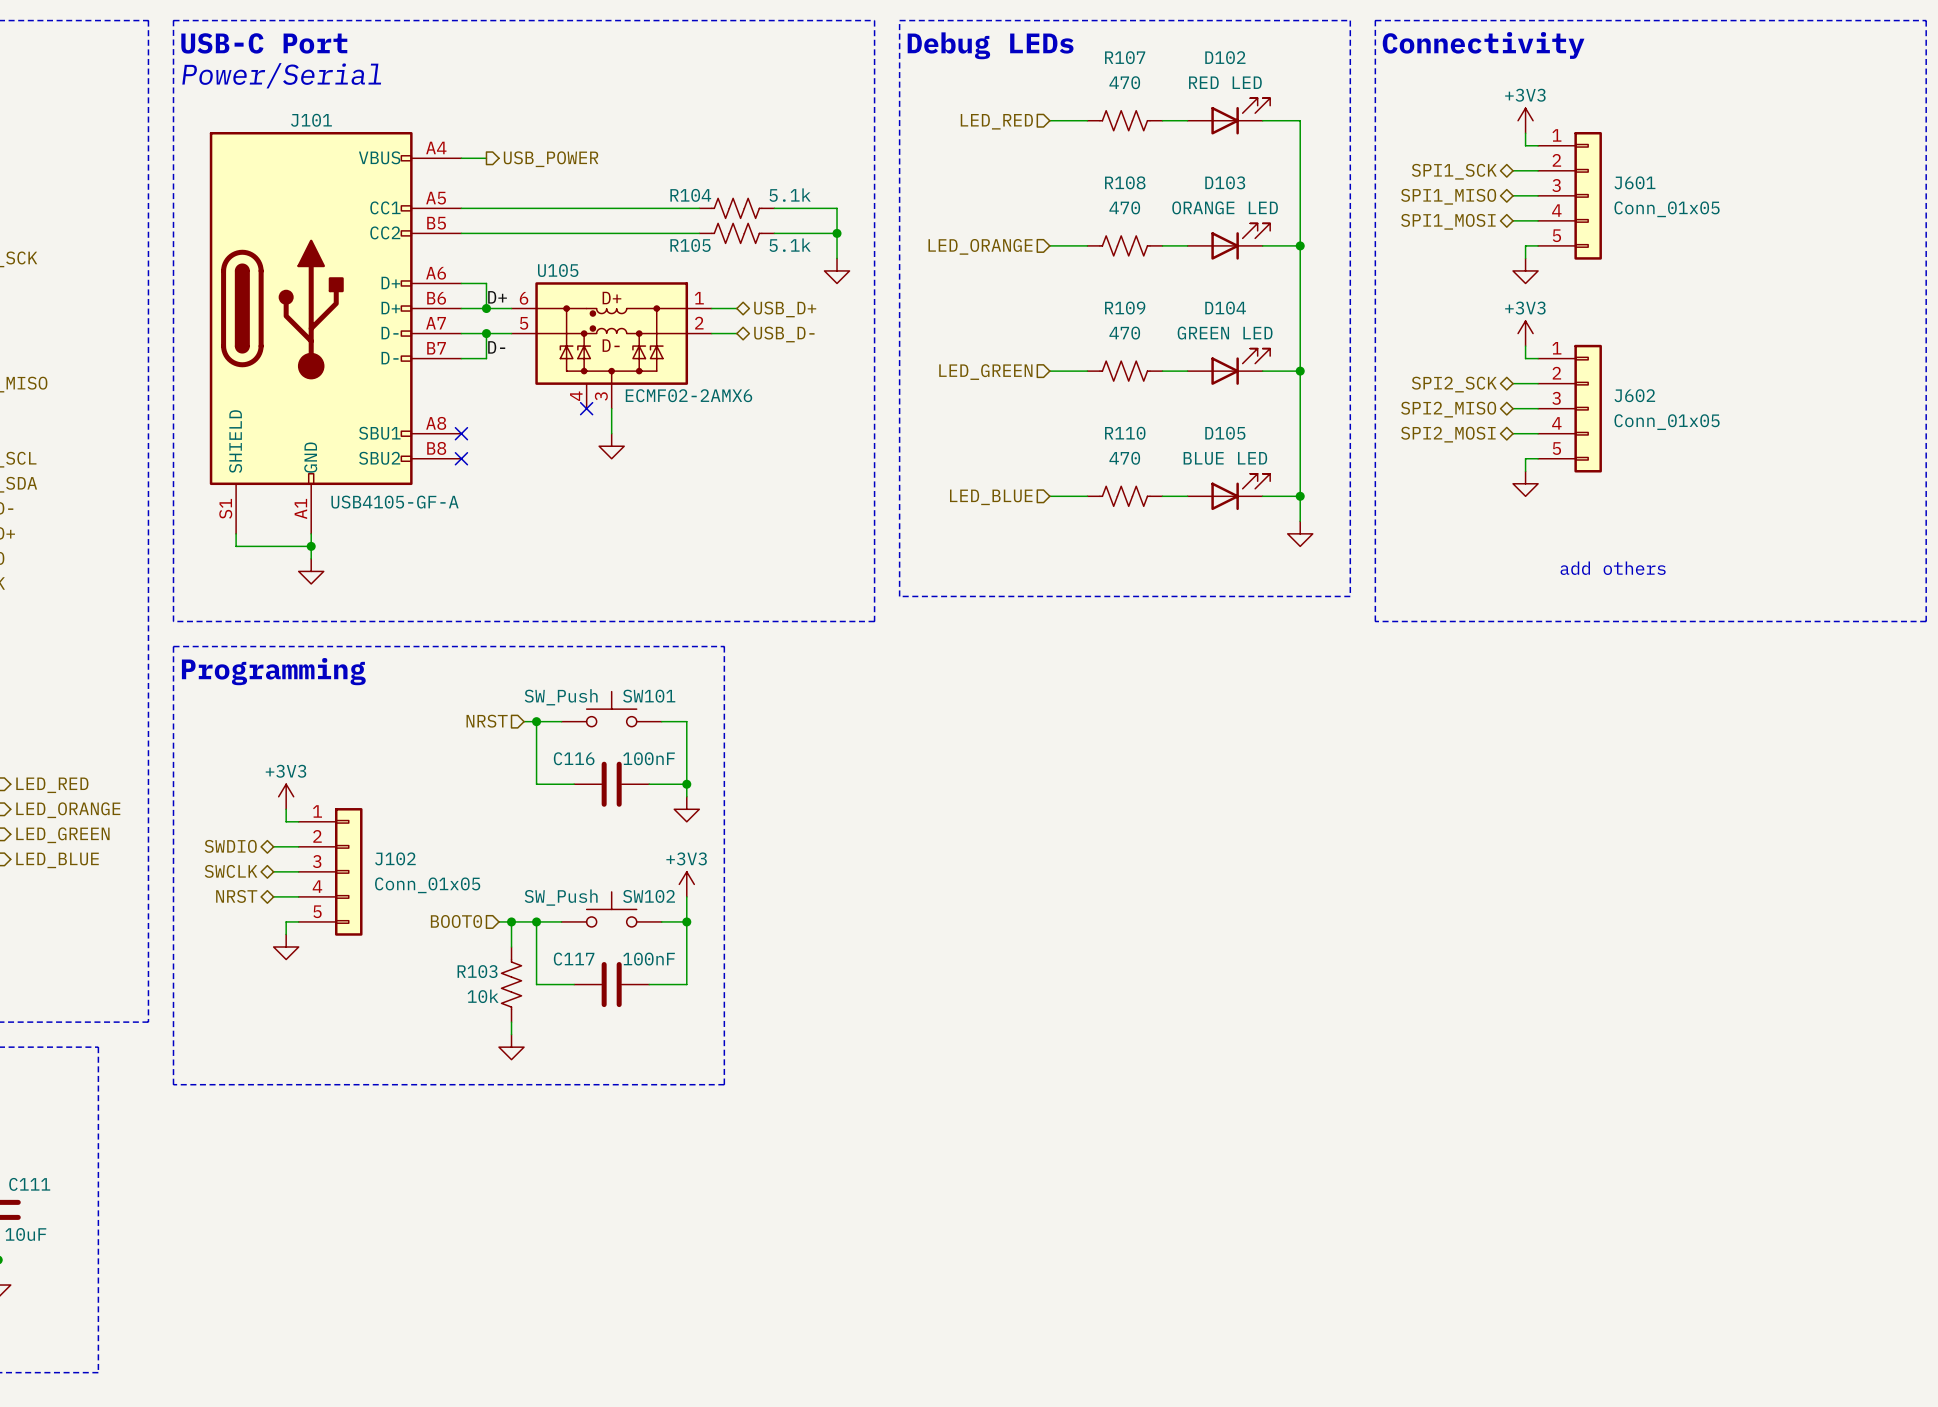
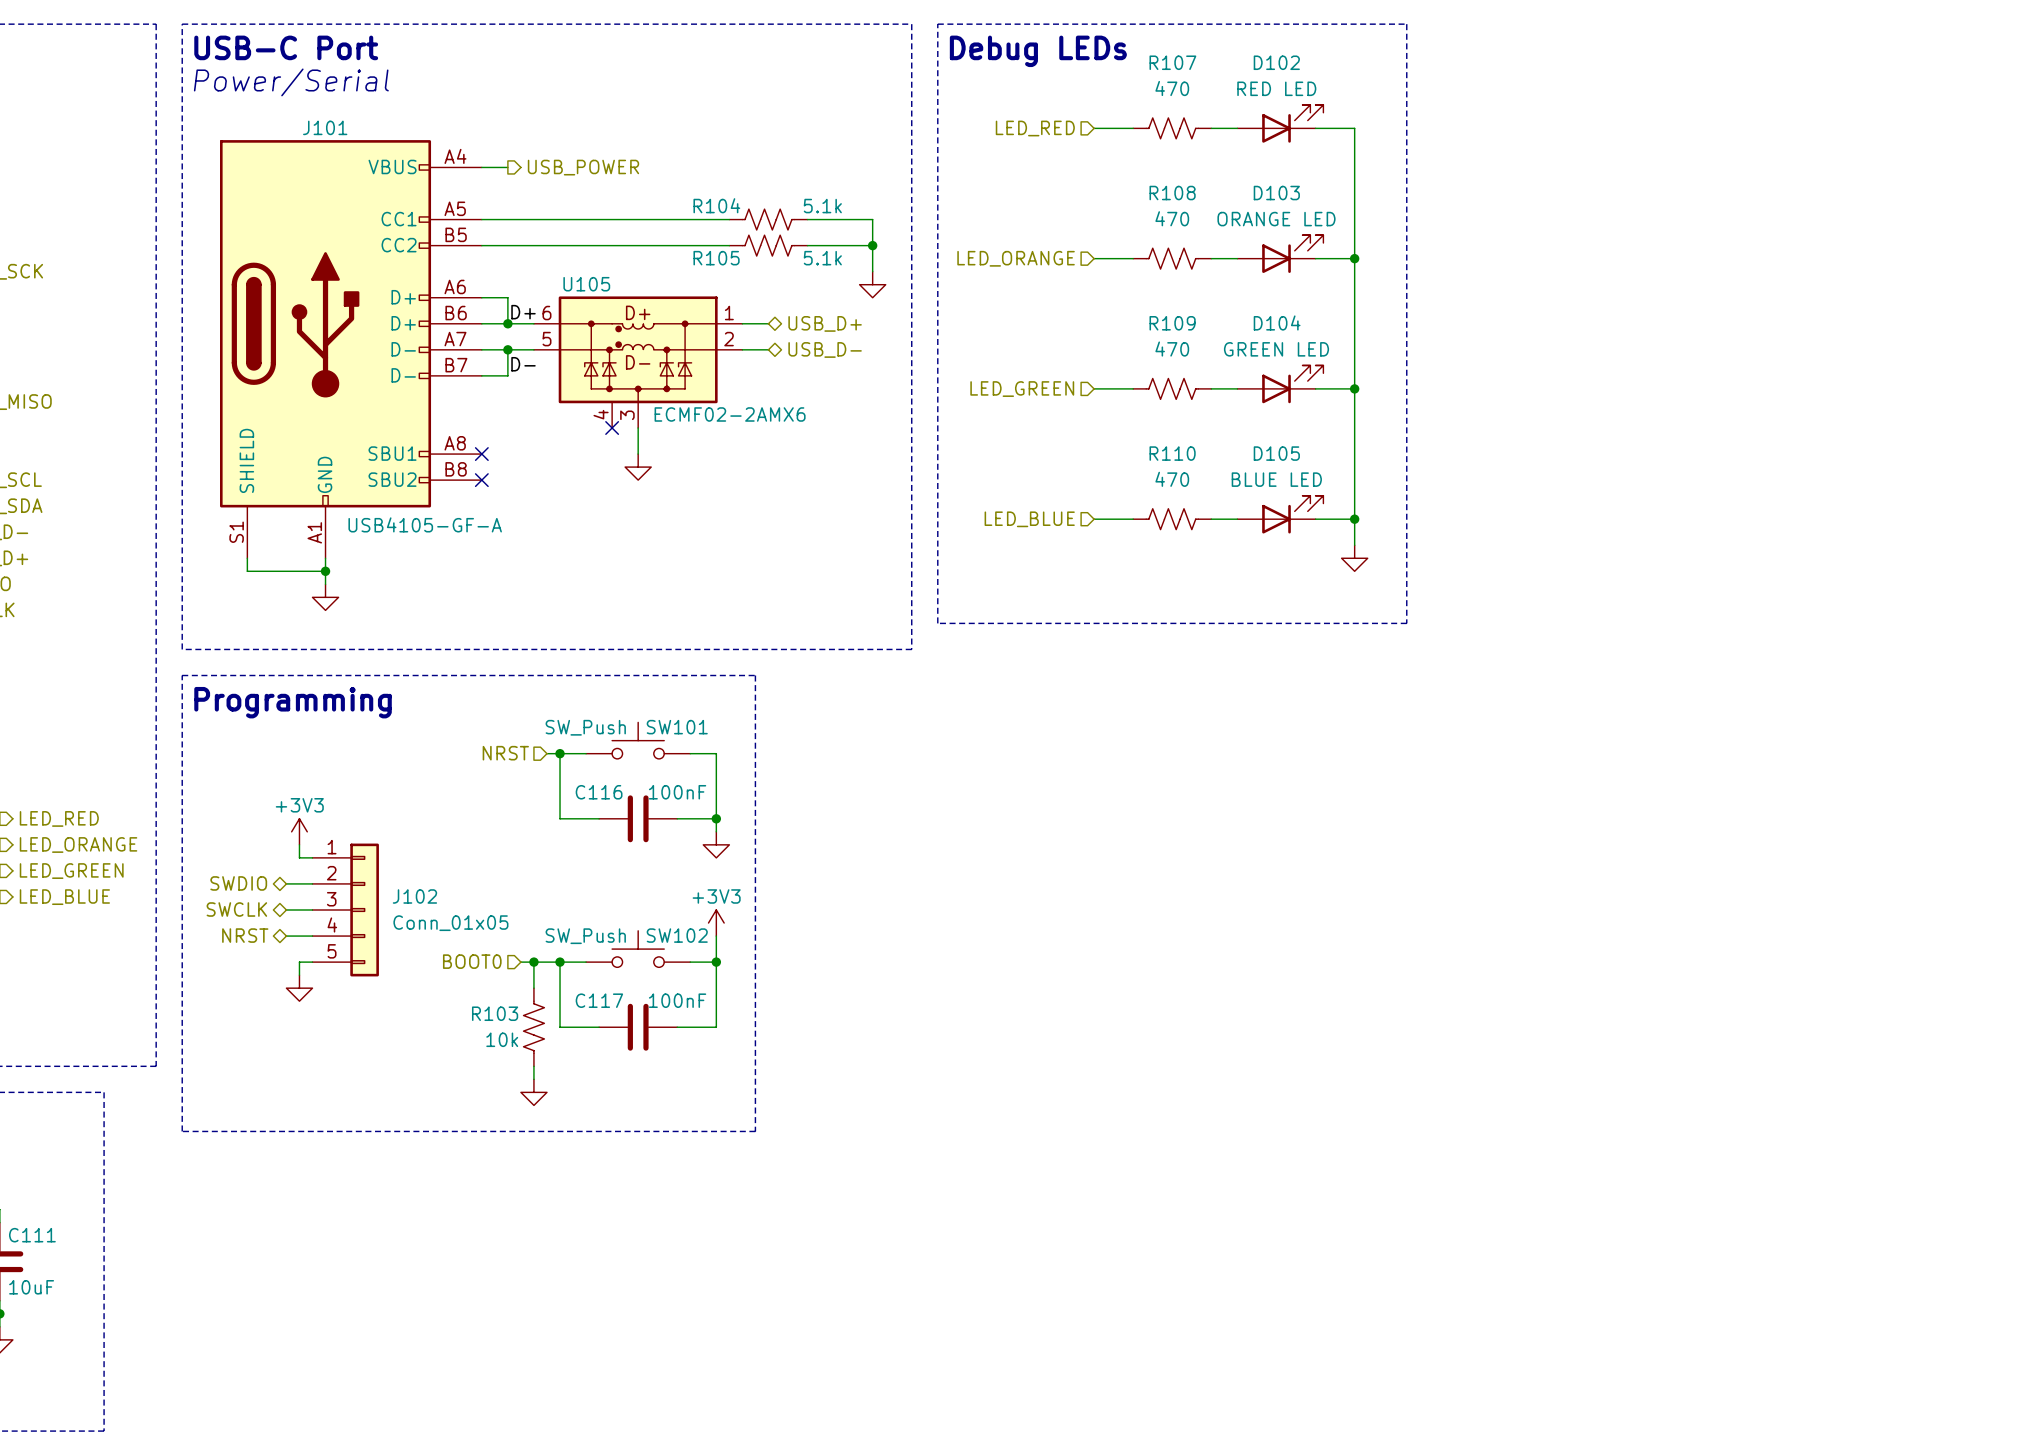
line: (1375, 20) (1926, 20) (1926, 621) (1375, 621) (1375, 20) -> none
text: Connectivity (1483, 45) -> none
power symbol: +3V3 (1525, 120) -> none
wire: (1525, 133) (1525, 145) (1538, 145) -> none
wire: (1513, 170) (1538, 170) -> none
hierarchical label: SPI1_SCK (1454, 171) -> none
wire: (1513, 195) (1538, 195) -> none
J601: Conn_01x05 (1570, 195) -> none
hierarchical label: SPI1_MISO (1448, 196) -> none
wire: (1513, 220) (1538, 220) -> none
hierarchical label: SPI1_MOSI (1448, 221) -> none
wire: (1538, 245) (1525, 245) (1525, 258) -> none
power symbol: (1525, 270) -> none
power symbol: +3V3 (1525, 333) -> none
wire: (1525, 346) (1525, 358) (1538, 358) -> none
wire: (1513, 383) (1538, 383) -> none
hierarchical label: SPI2_SCK (1454, 384) -> none
wire: (1513, 408) (1538, 408) -> none
J602: Conn_01x05 (1570, 408) -> none
hierarchical label: SPI2_MISO (1448, 409) -> none
wire: (1513, 433) (1538, 433) -> none
hierarchical label: SPI2_MOSI (1448, 434) -> none
wire: (1538, 458) (1525, 458) (1525, 471) -> none
power symbol: (1525, 483) -> none
text: add others (1613, 568) -> none

